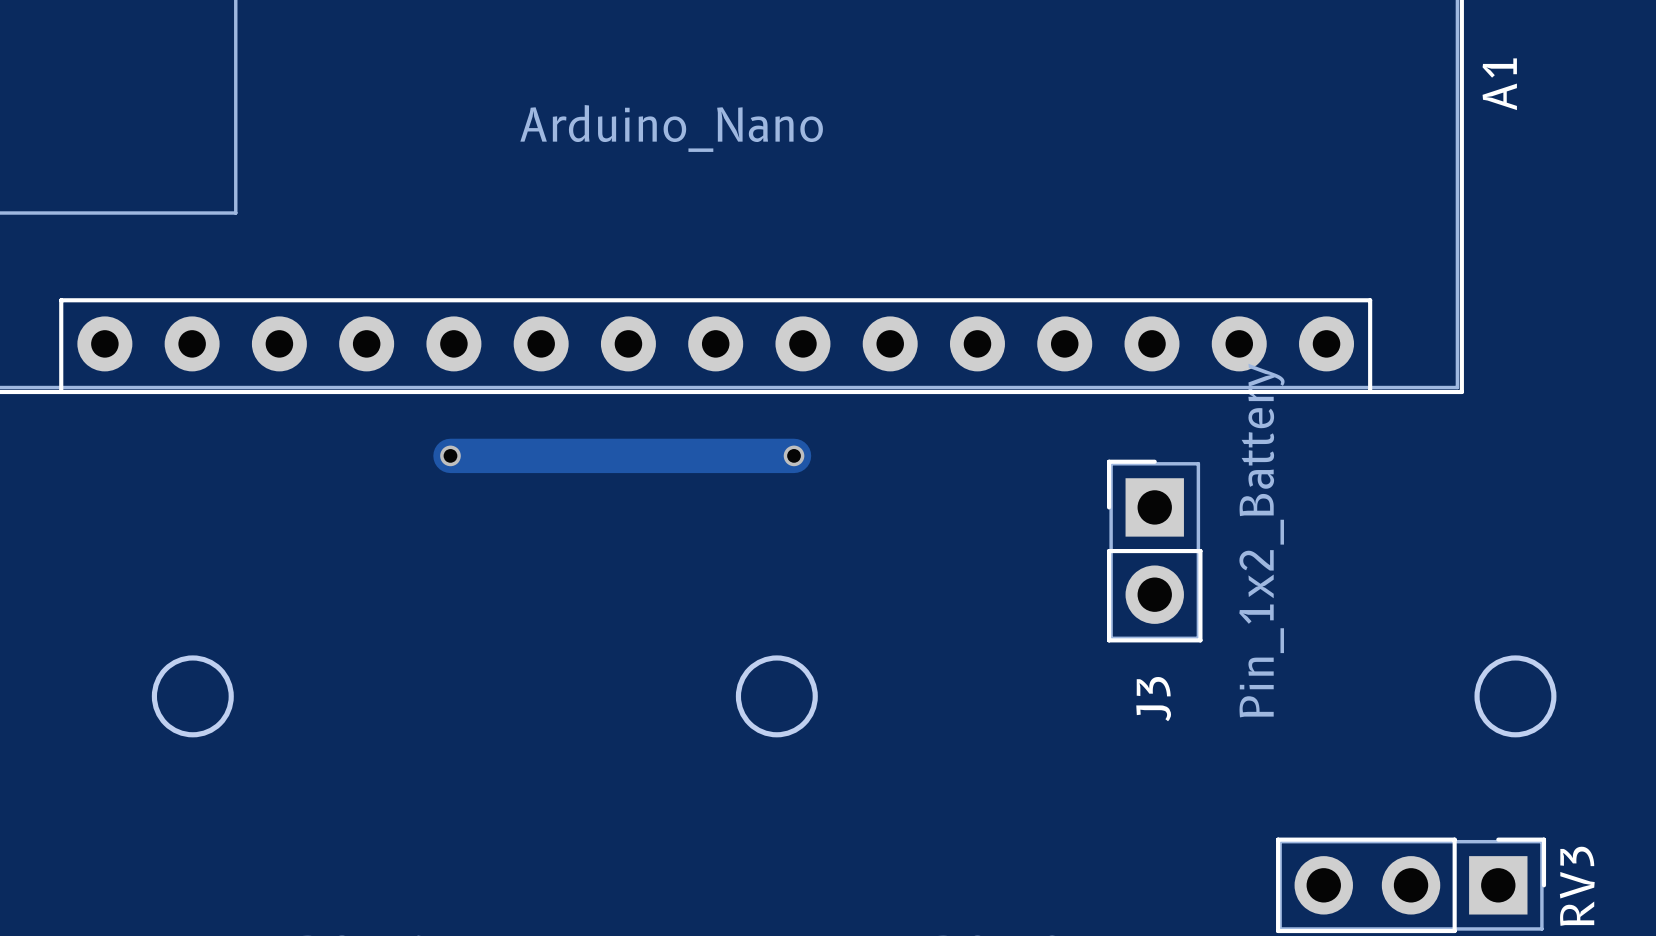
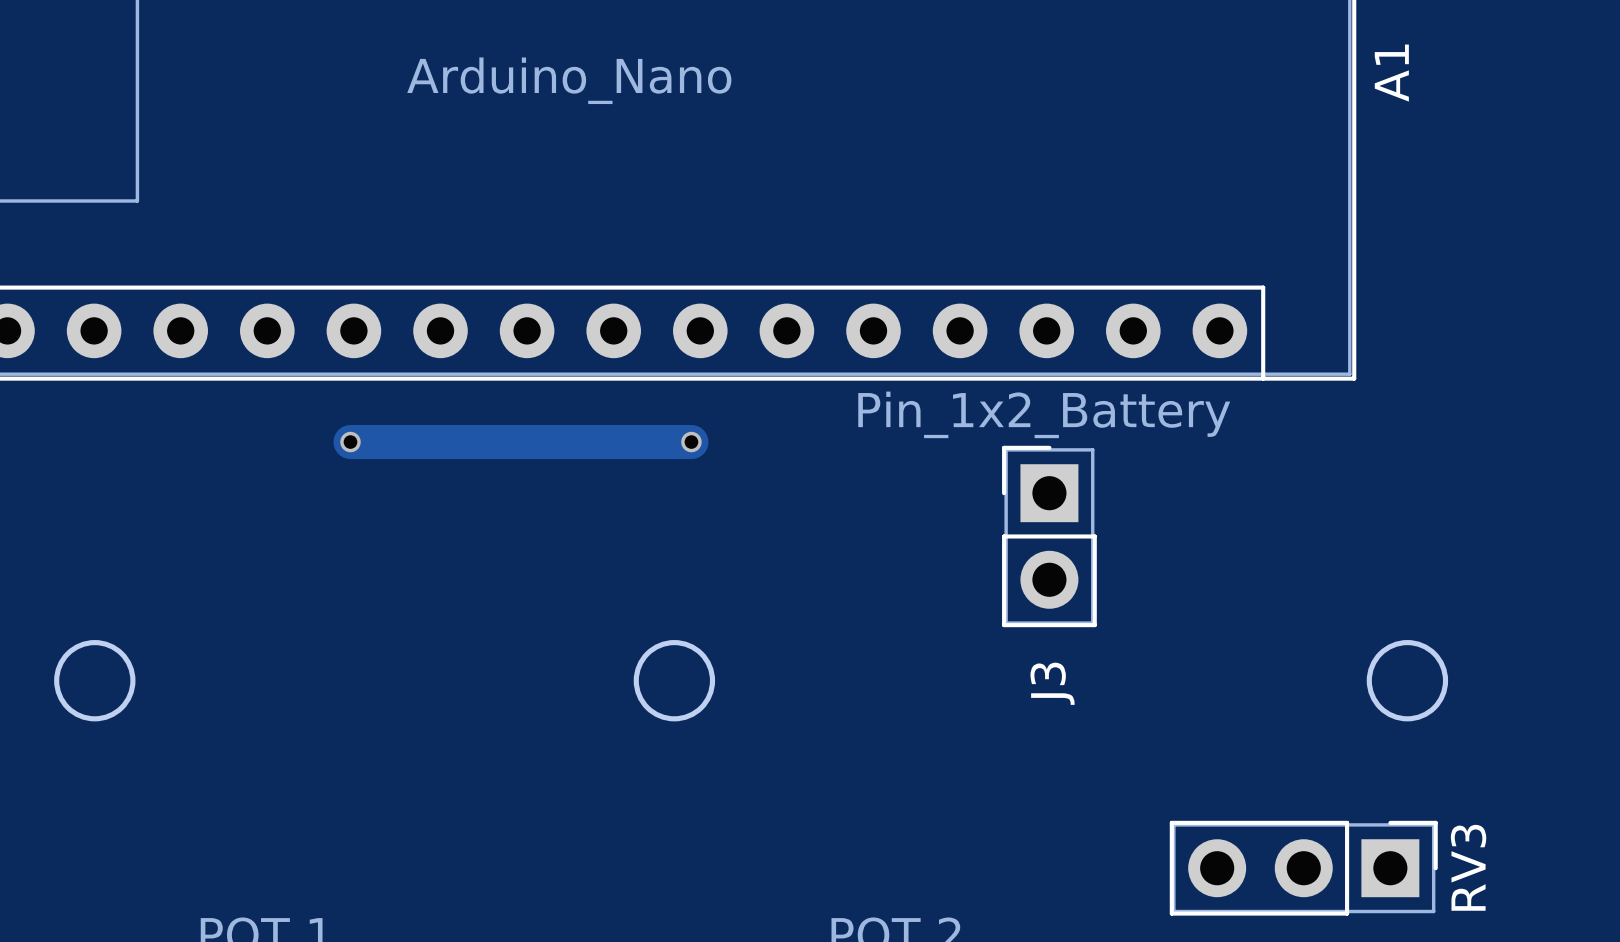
A1 value position: Arduino_Nano (671, 128) -> Arduino_Nano (569, 80)
J3 value rotation: 0° (1261, 540) -> 90° clockwise (1044, 414)

